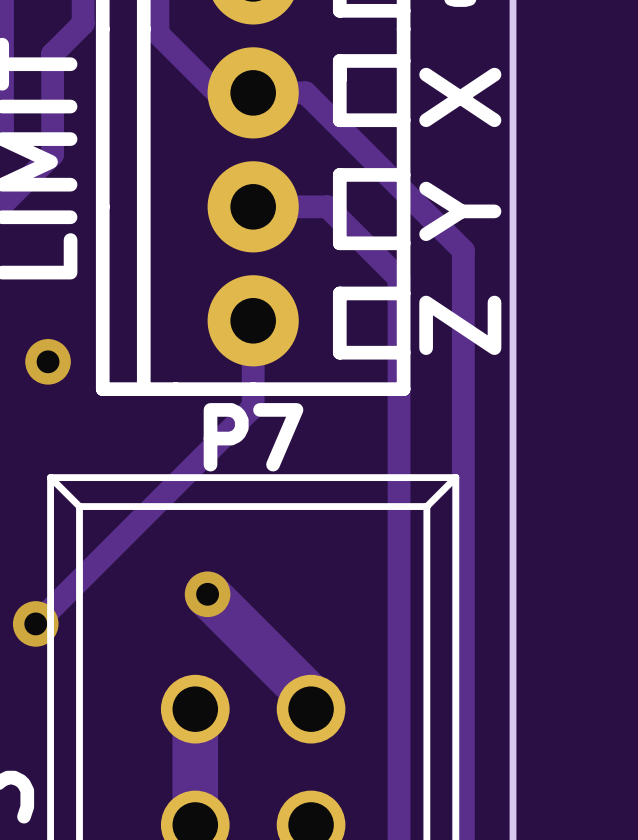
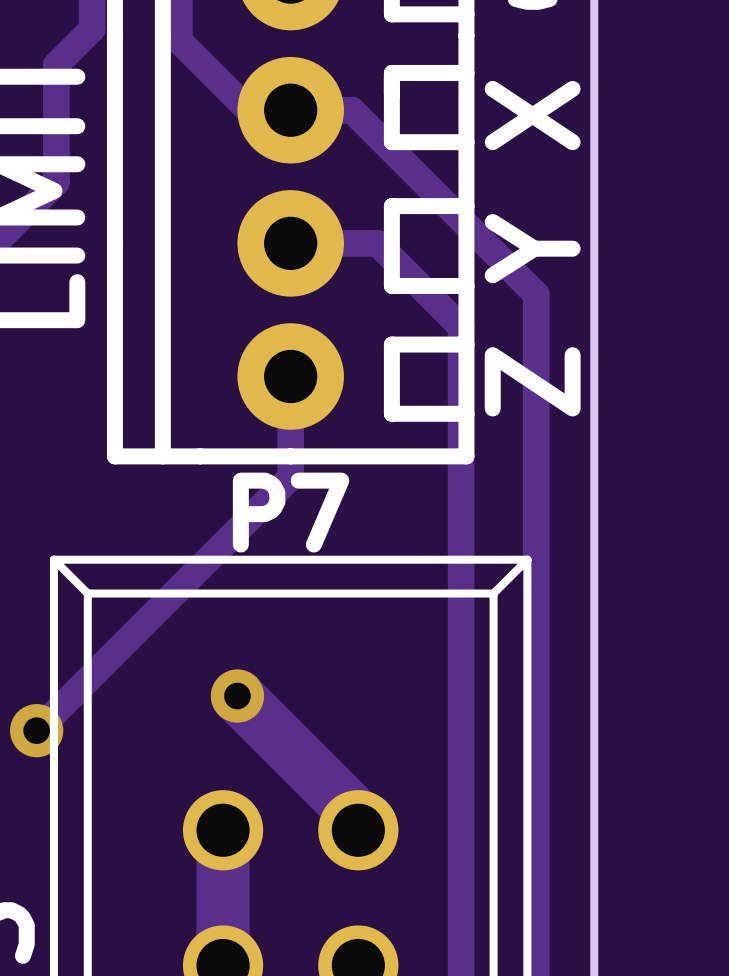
via: (48, 361) -> none

